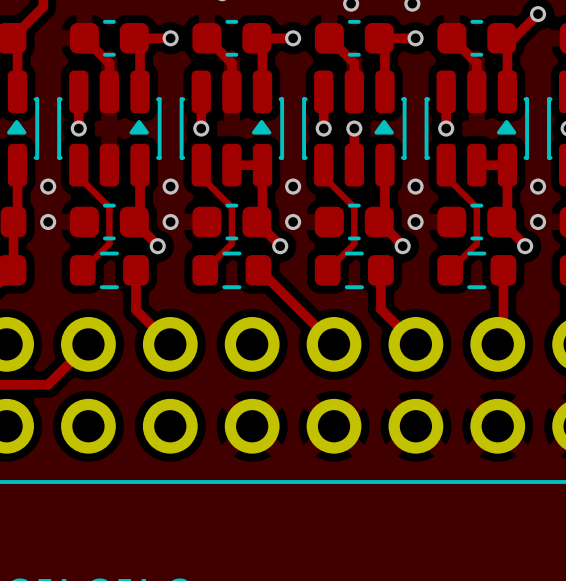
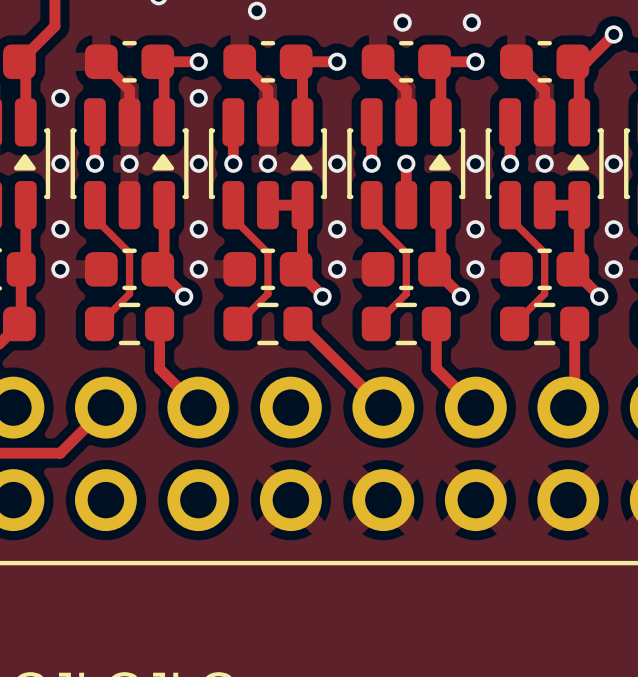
via: none -> (60, 98)
via: none -> (198, 98)
via: none -> (60, 163)
via: none -> (129, 163)
via: none -> (198, 163)
via: none -> (267, 163)
via: none -> (337, 163)
via: none -> (475, 163)
via: none -> (544, 163)
via: none -> (613, 163)

